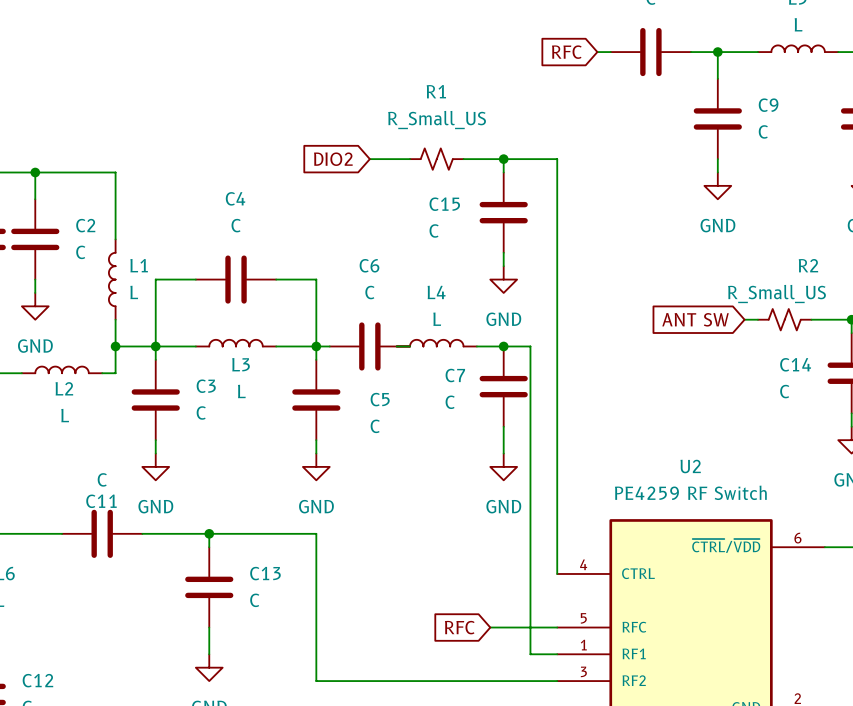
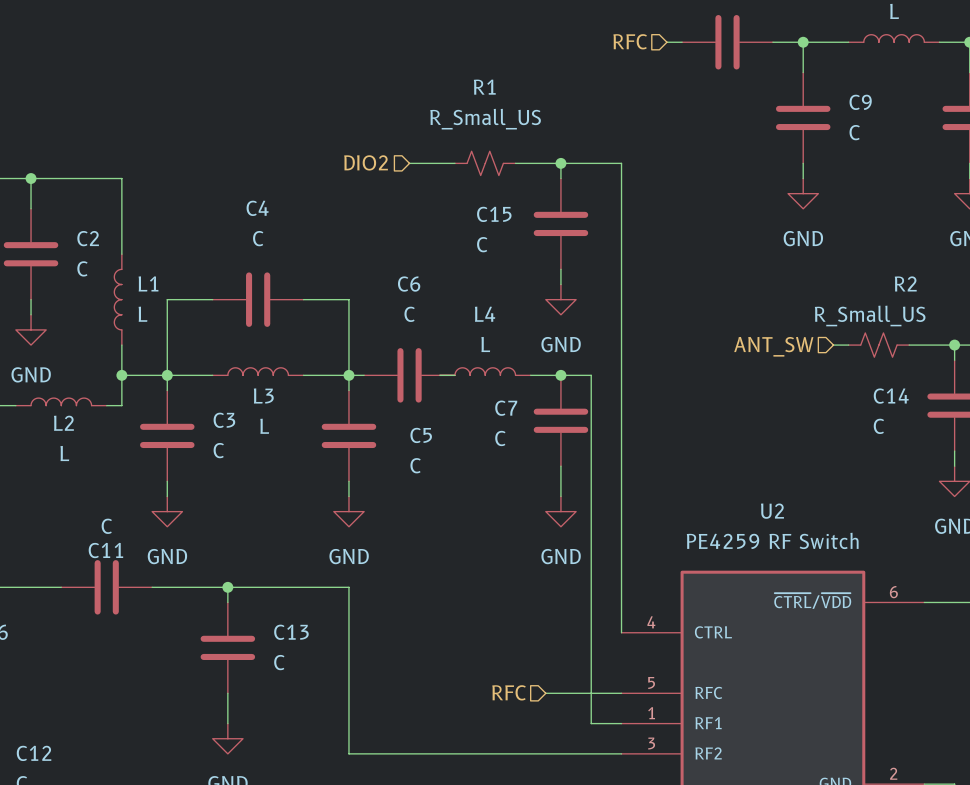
hierarchical label: none -> RFC (630, 41)
global label: RFC (566, 52) -> none
hierarchical label: none -> DIO2 (366, 162)
global label: DIO2 (333, 159) -> none
global label: ANT SW (695, 319) -> none
hierarchical label: none -> ANT_SW (773, 346)
hierarchical label: none -> RFC (509, 692)
global label: RFC (459, 627) -> none

